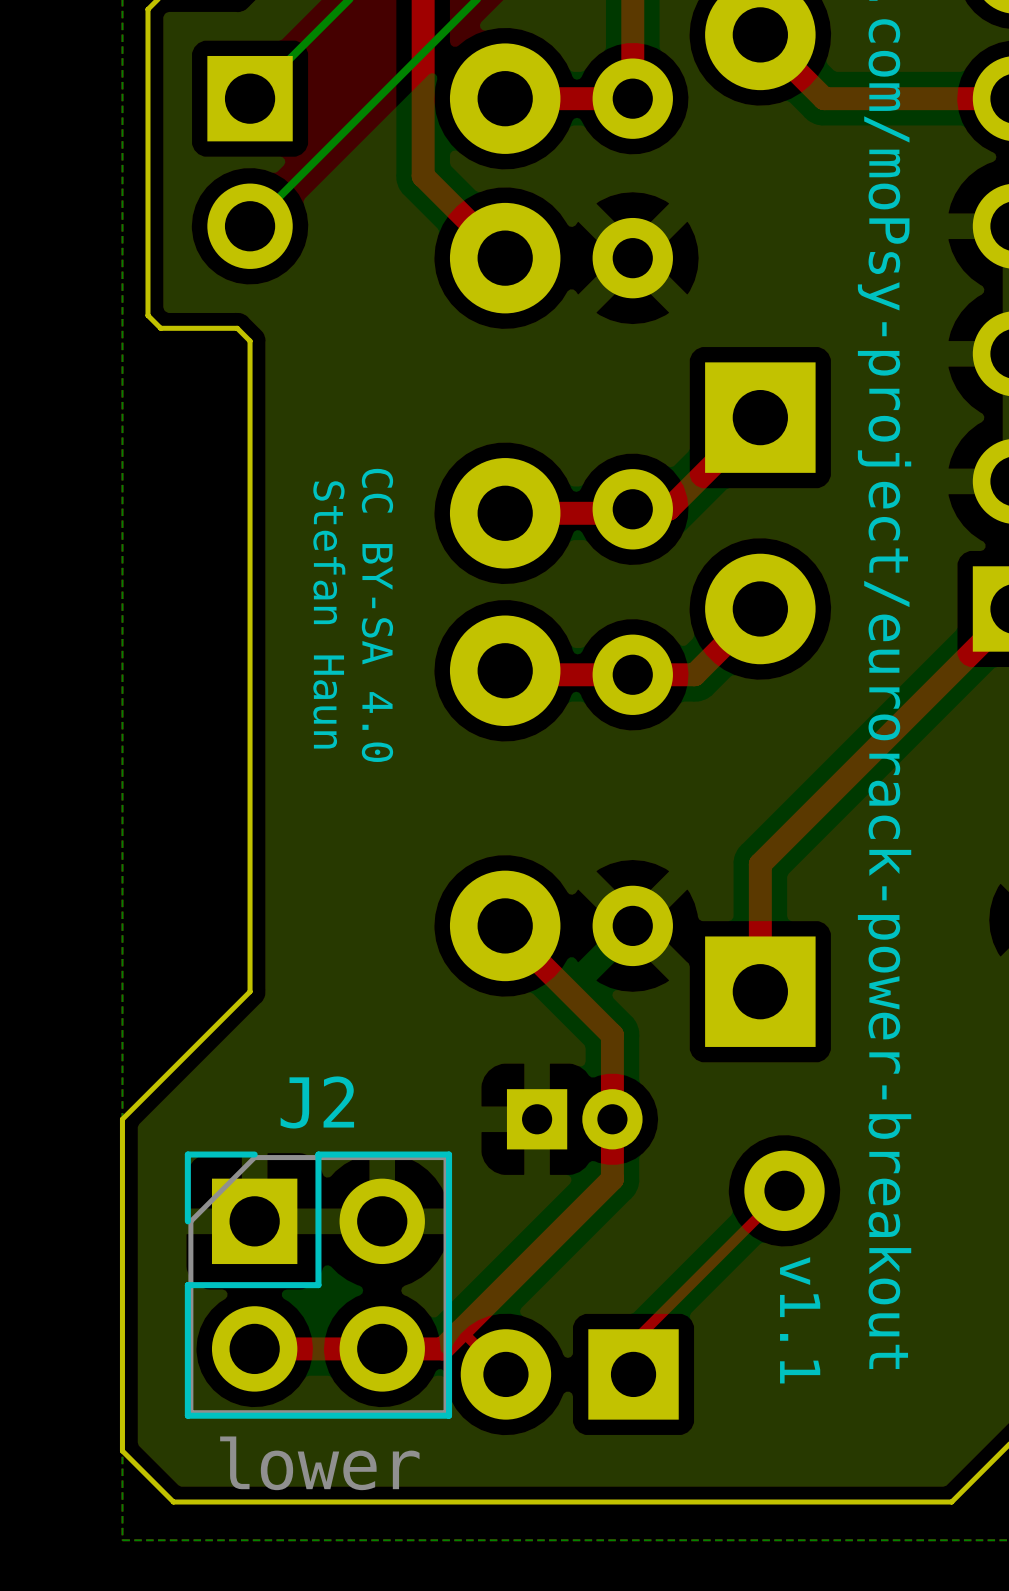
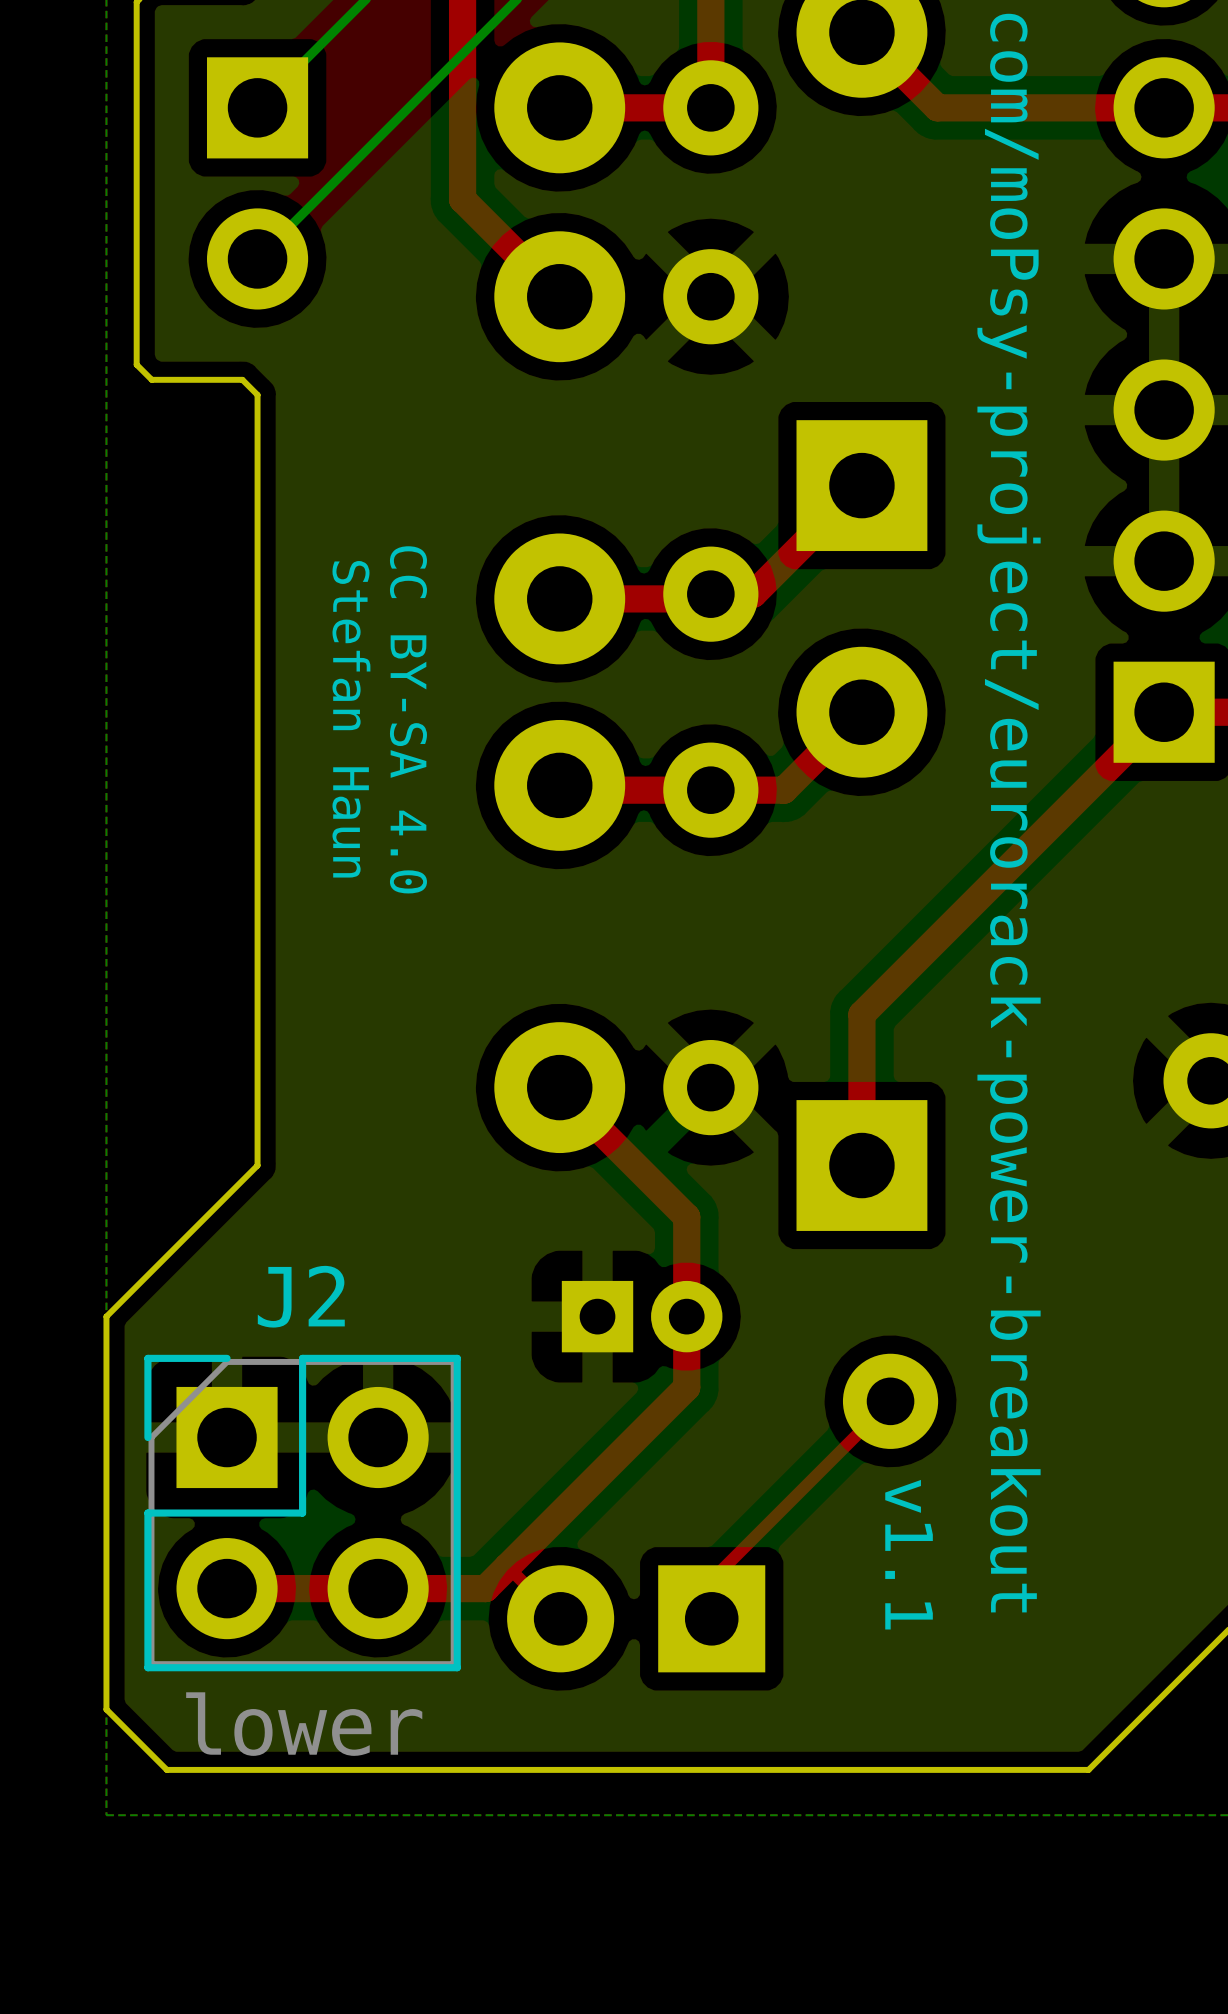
J2 position: (318, 1285) -> (302, 1513)

